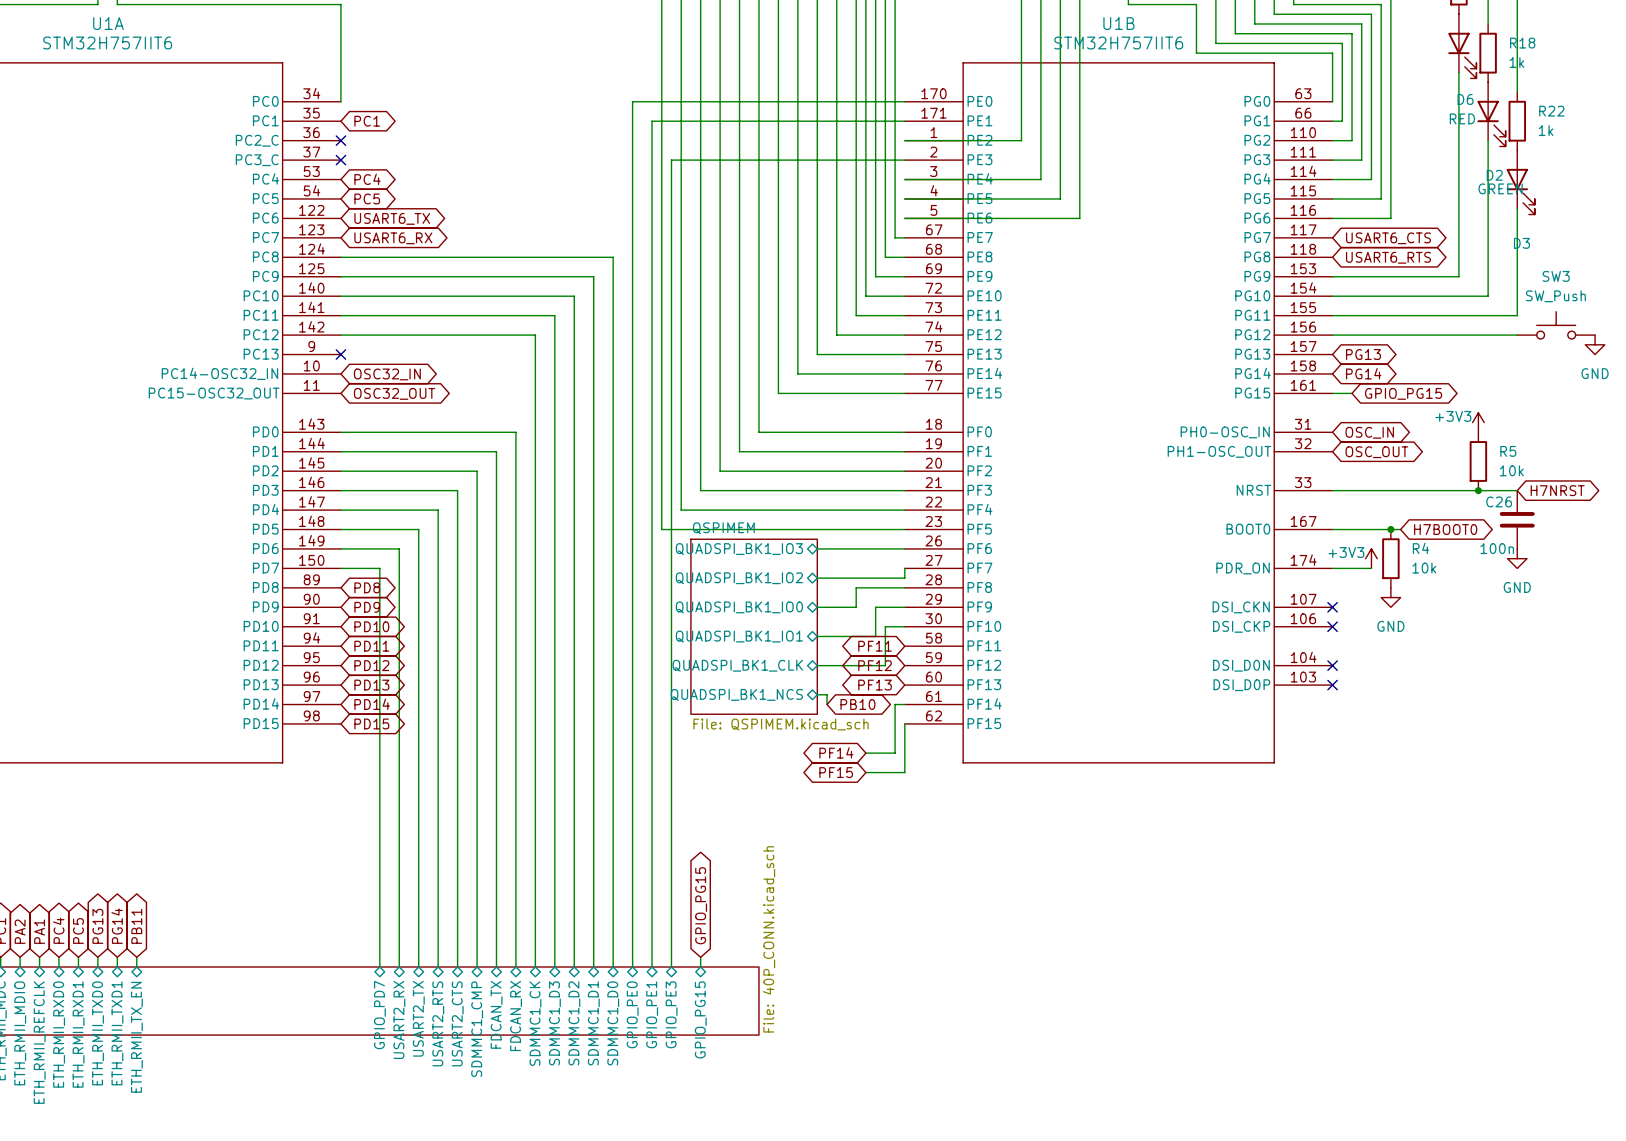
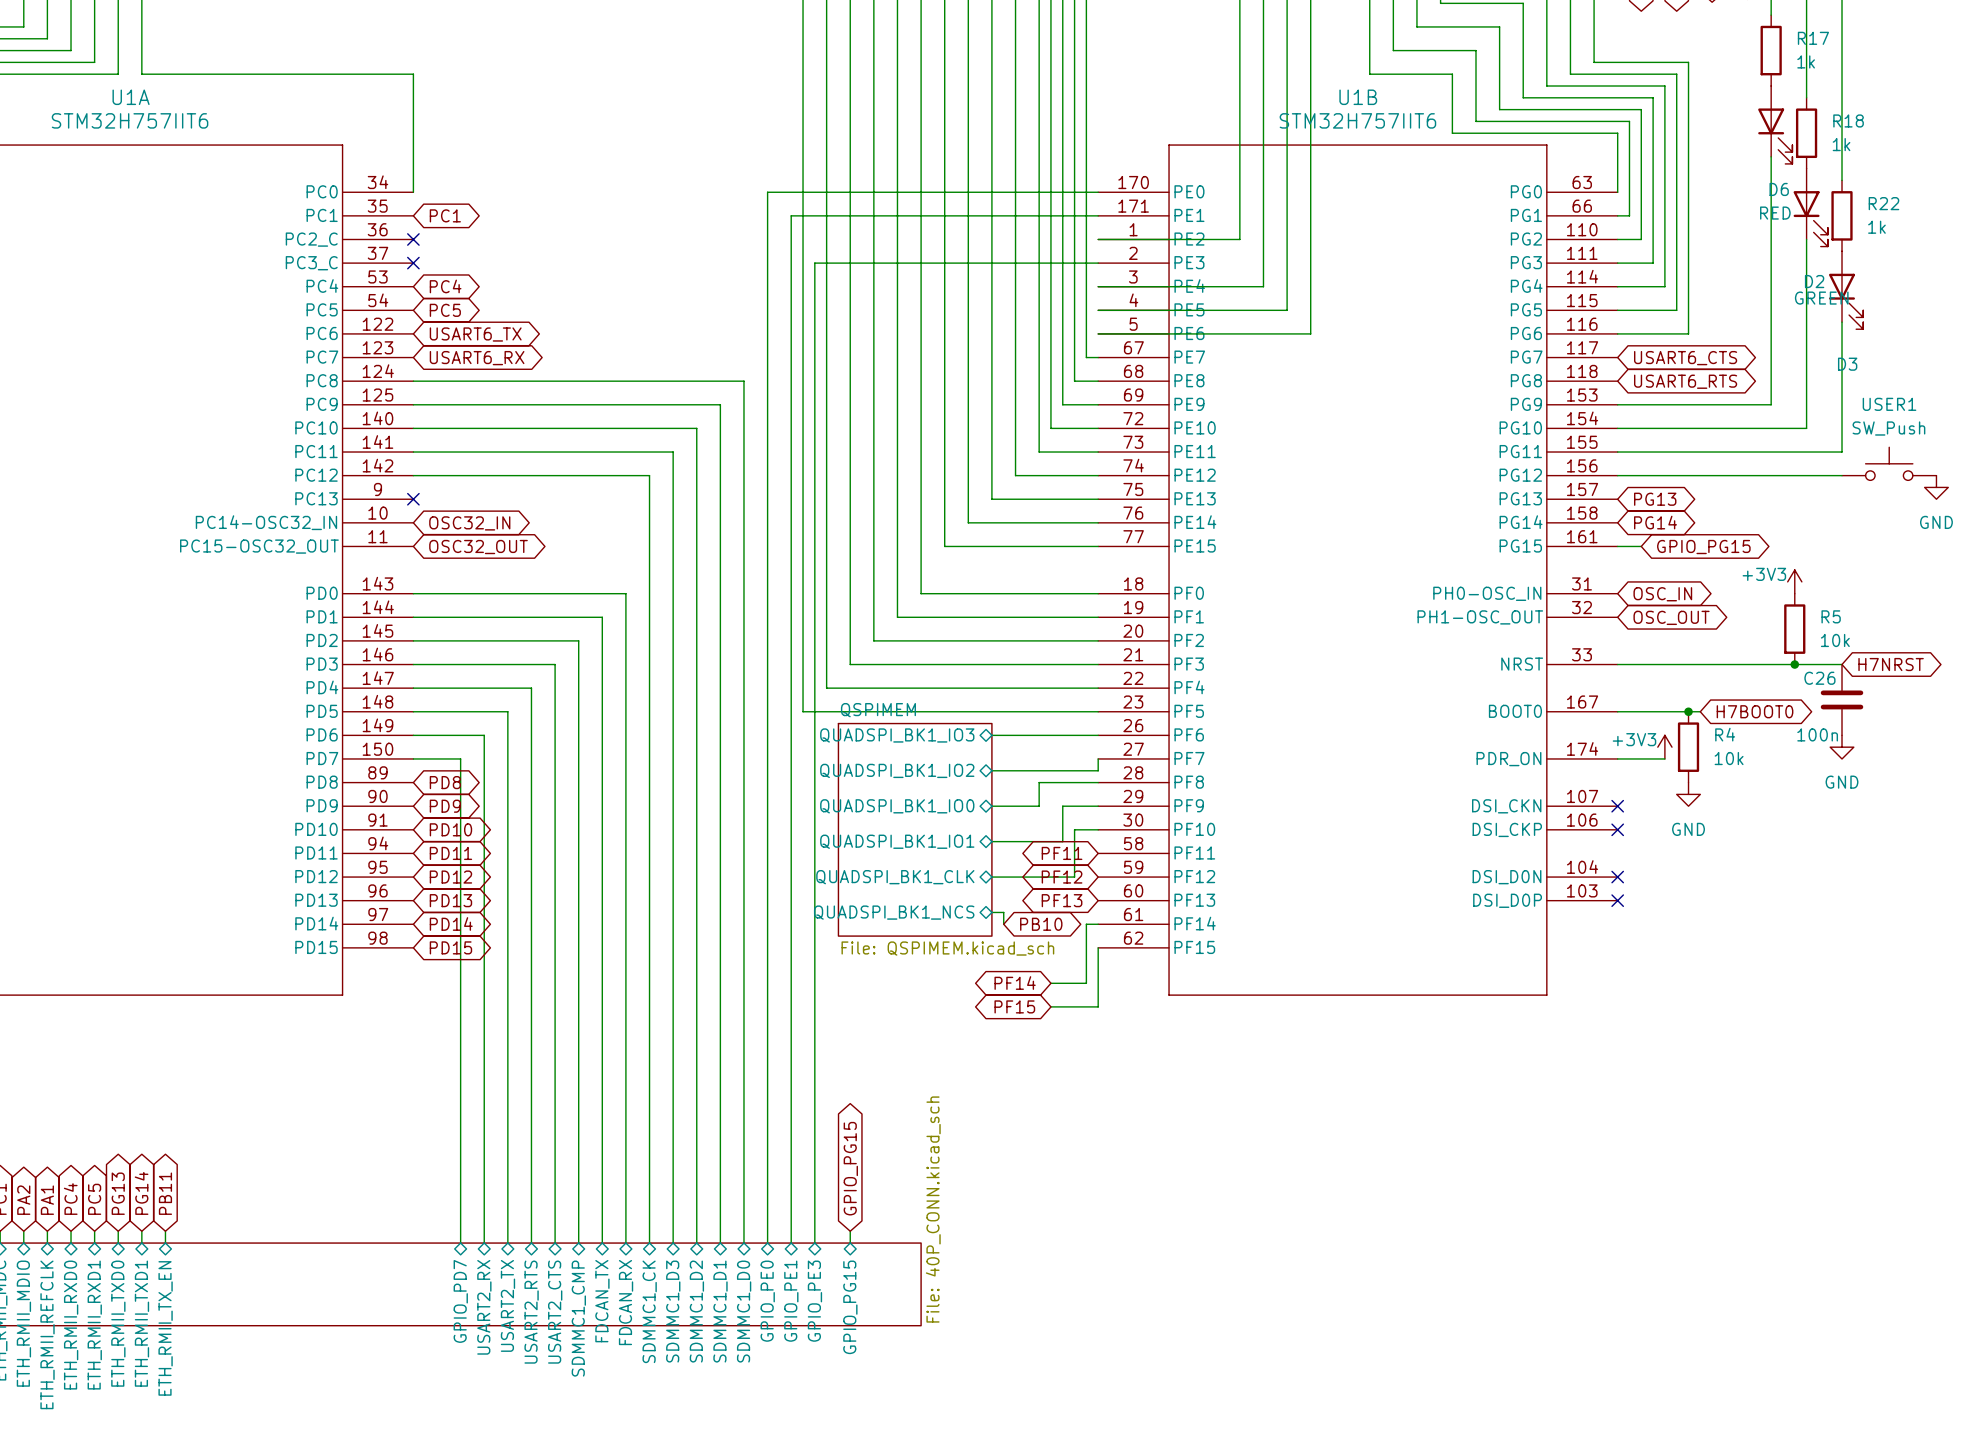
SW3 name: SW3 (1556, 276) -> USER1 (1889, 404)

